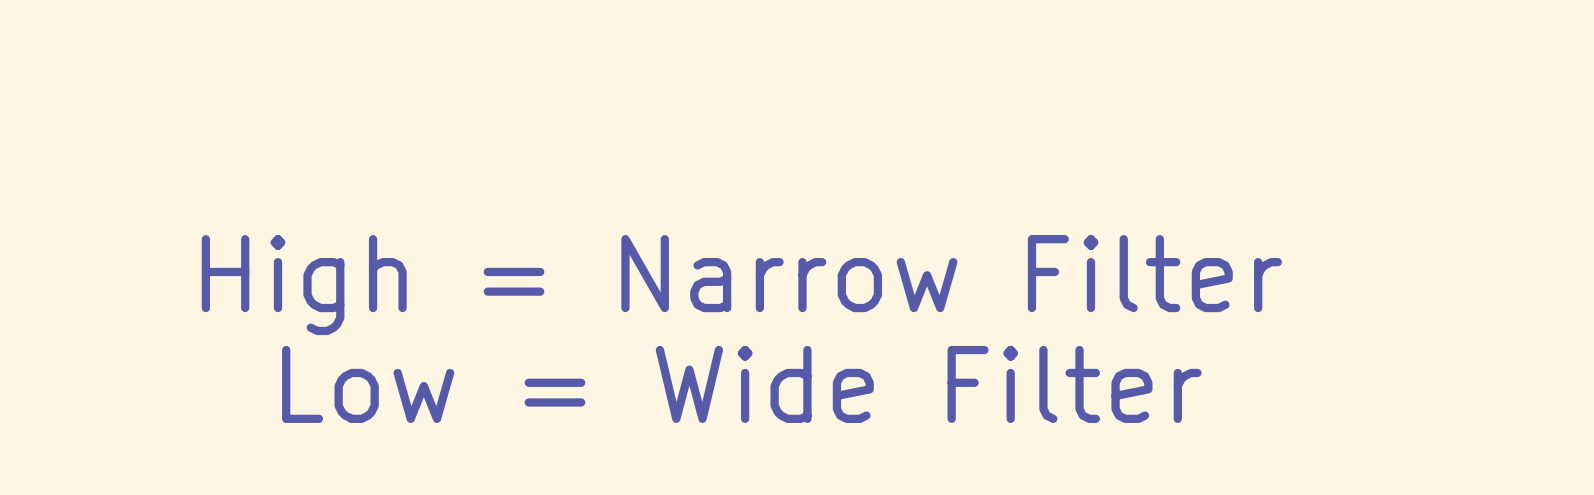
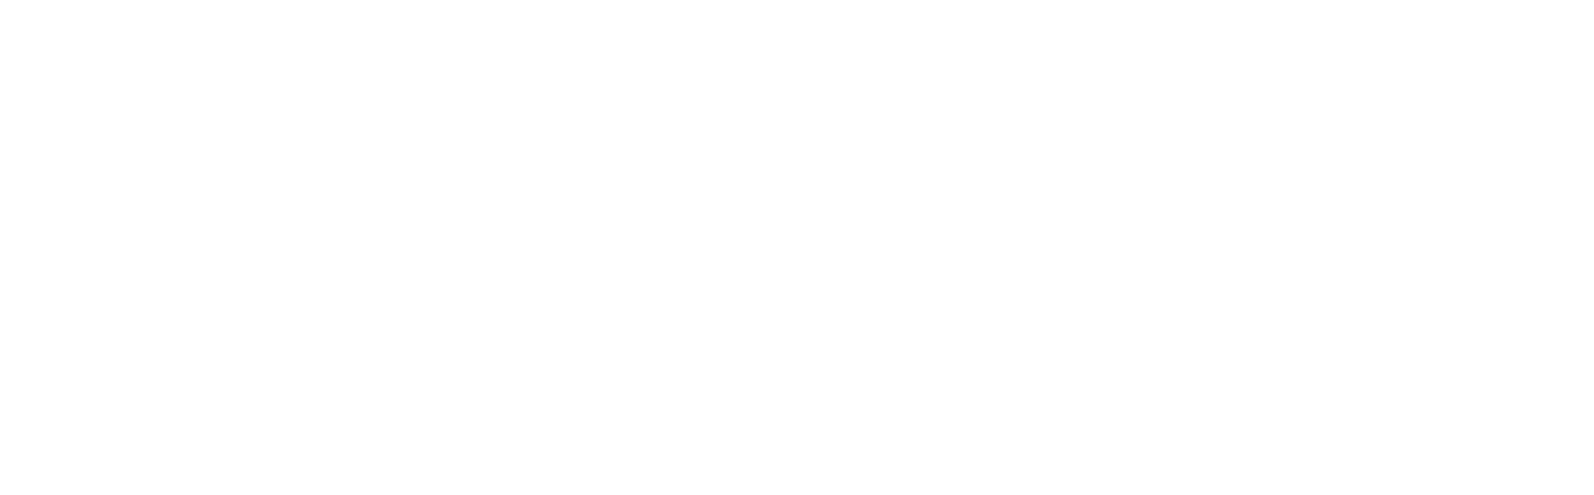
text: High = Narrow Filter (741, 285) -> none
text: Low = Wide Filter (741, 384) -> none

